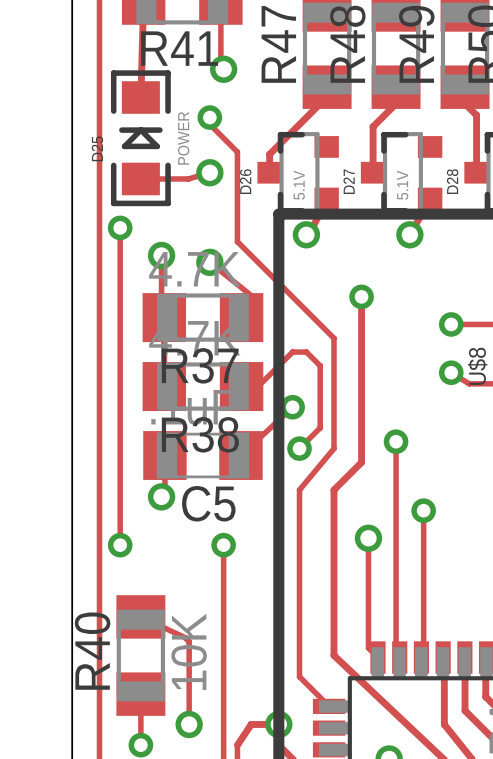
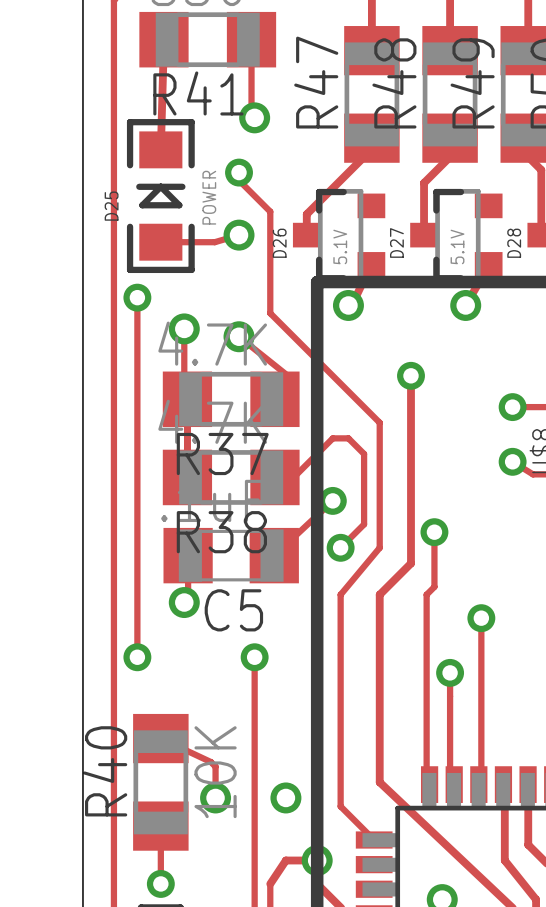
track: (396, 441) (396, 558) -> none
via position: (396, 441) -> (434, 532)
track: (368, 538) (368, 648) (375, 654) -> (434, 532) (434, 586) (426, 594) (426, 781)
via: (368, 538) -> none
via: none -> (450, 672)
track: (189, 669) (189, 724) -> none
via: none -> (215, 797)
via: none -> (285, 797)
via: (189, 724) -> none

